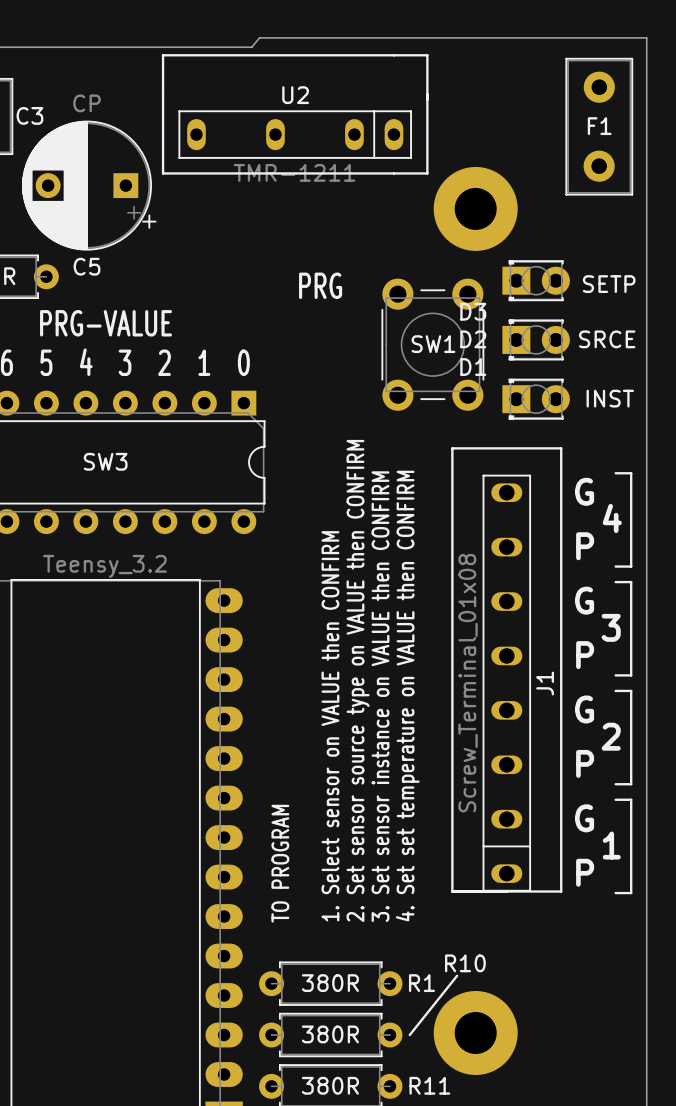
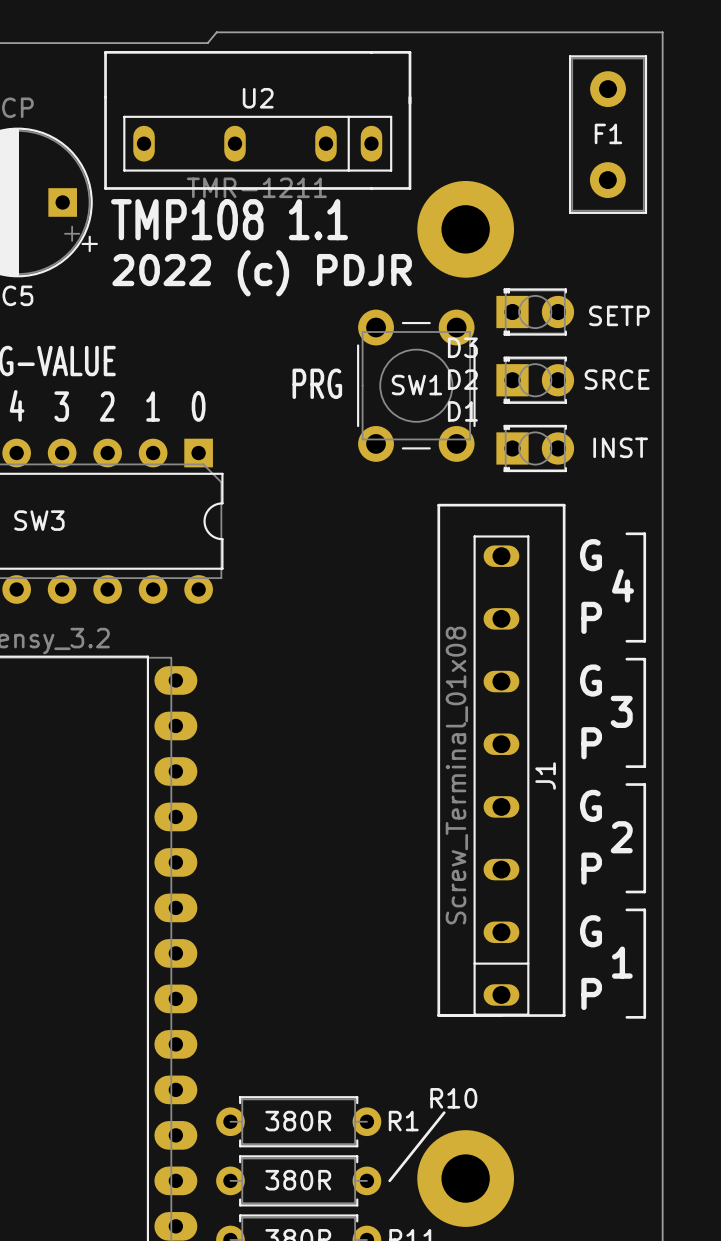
text: none -> TMP108 1.1 (229, 219)
text: none -> 2022 (c) PDJR (262, 273)
SW1 value position: PRG (320, 285) -> PRG (317, 383)
text: 2. Set sensor source type on VALUE then CONFIRM (358, 680) -> none
text: 3. Set sensor instance on VALUE then CONFIRM (380, 696) -> none
text: 4. Set set temperature on VALUE then CONFIRM (407, 696) -> none
text: 1. Select sensor on VALUE then CONFIRM (330, 726) -> none
text: TO PROGRAM (280, 863) -> none

